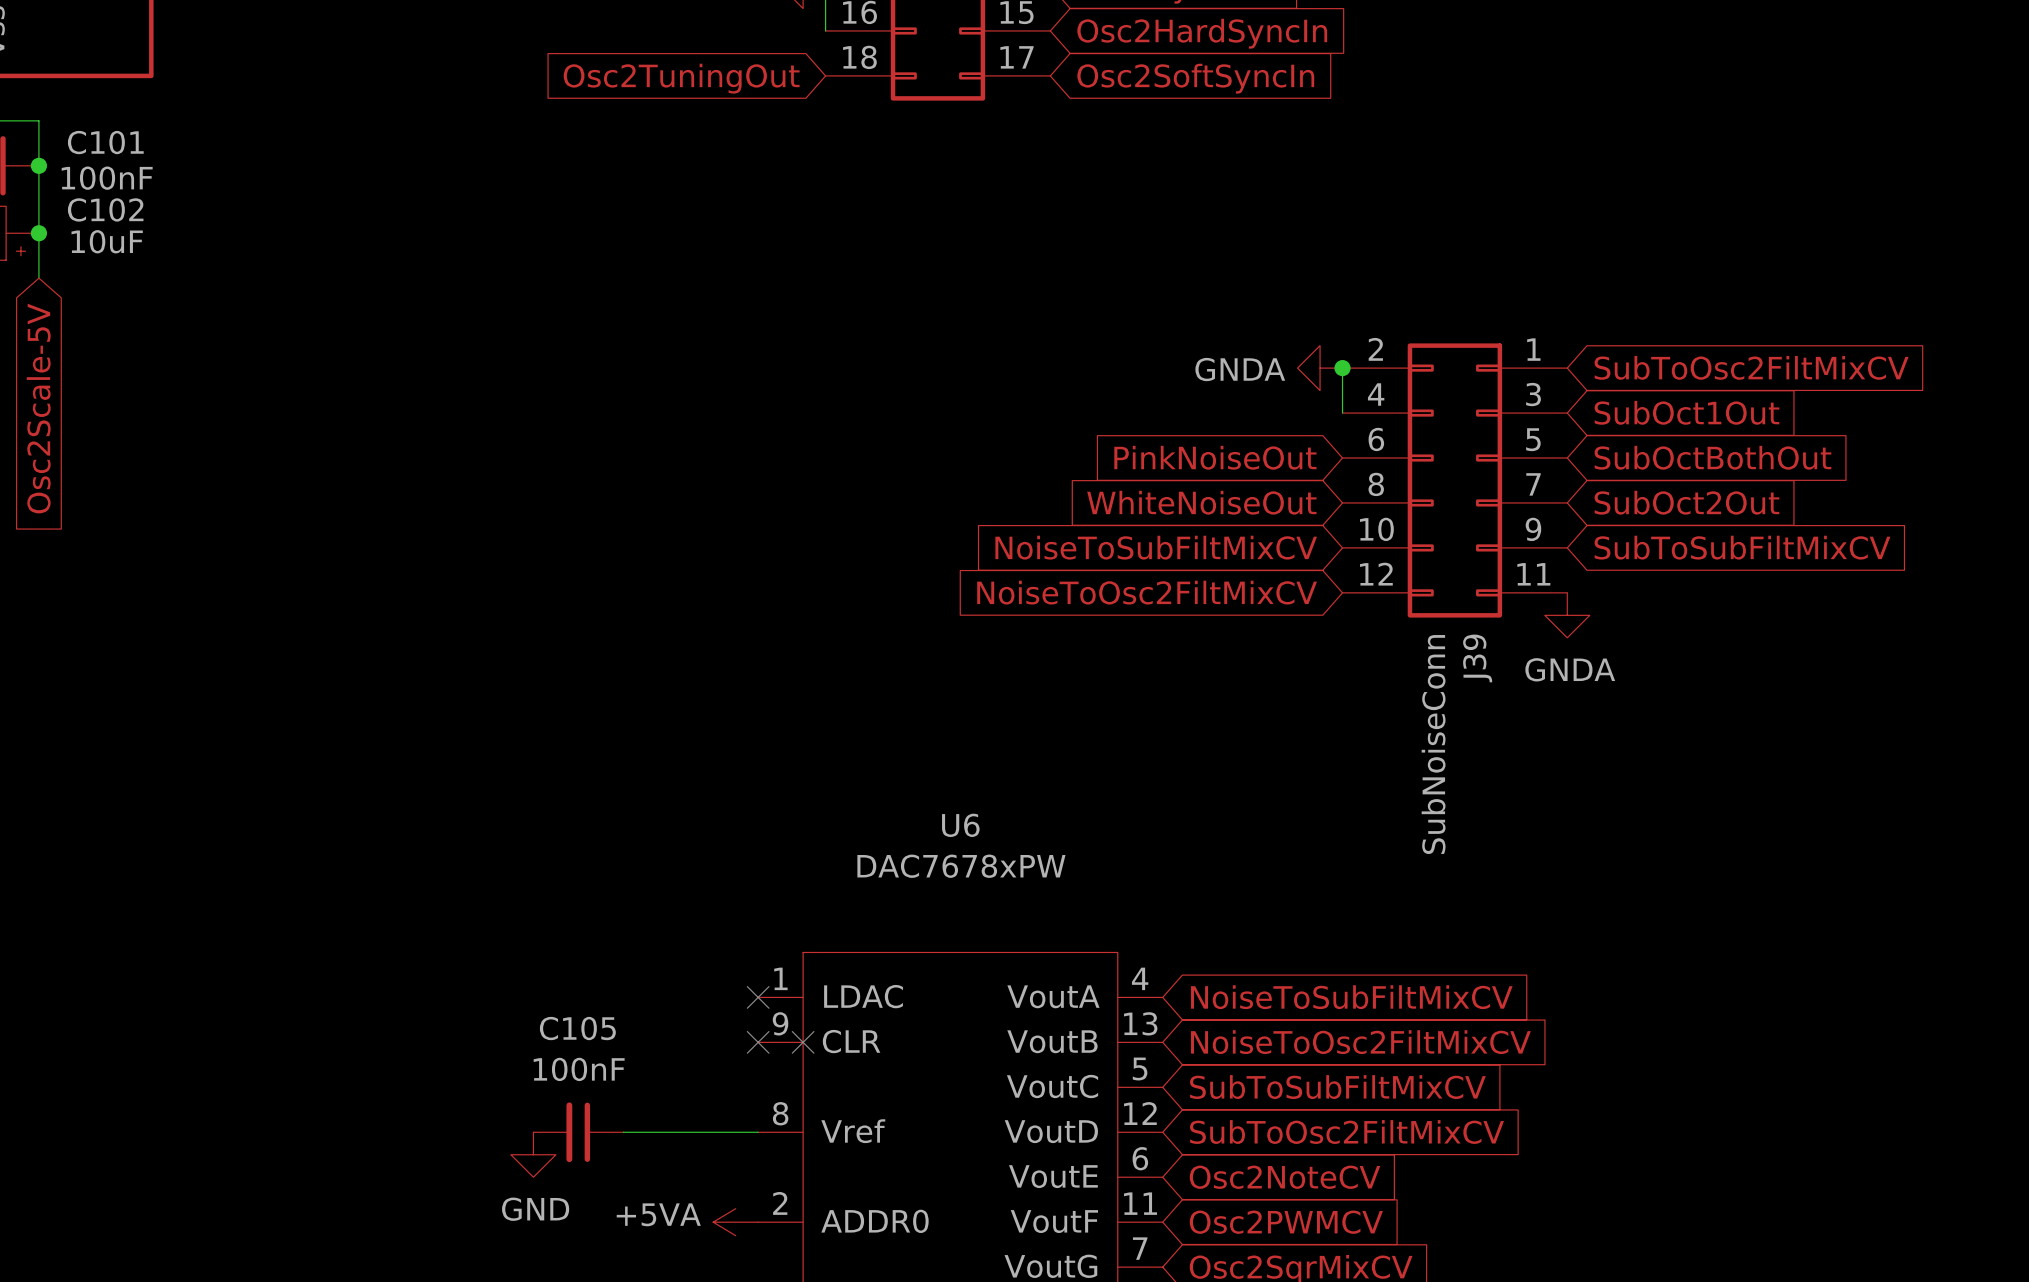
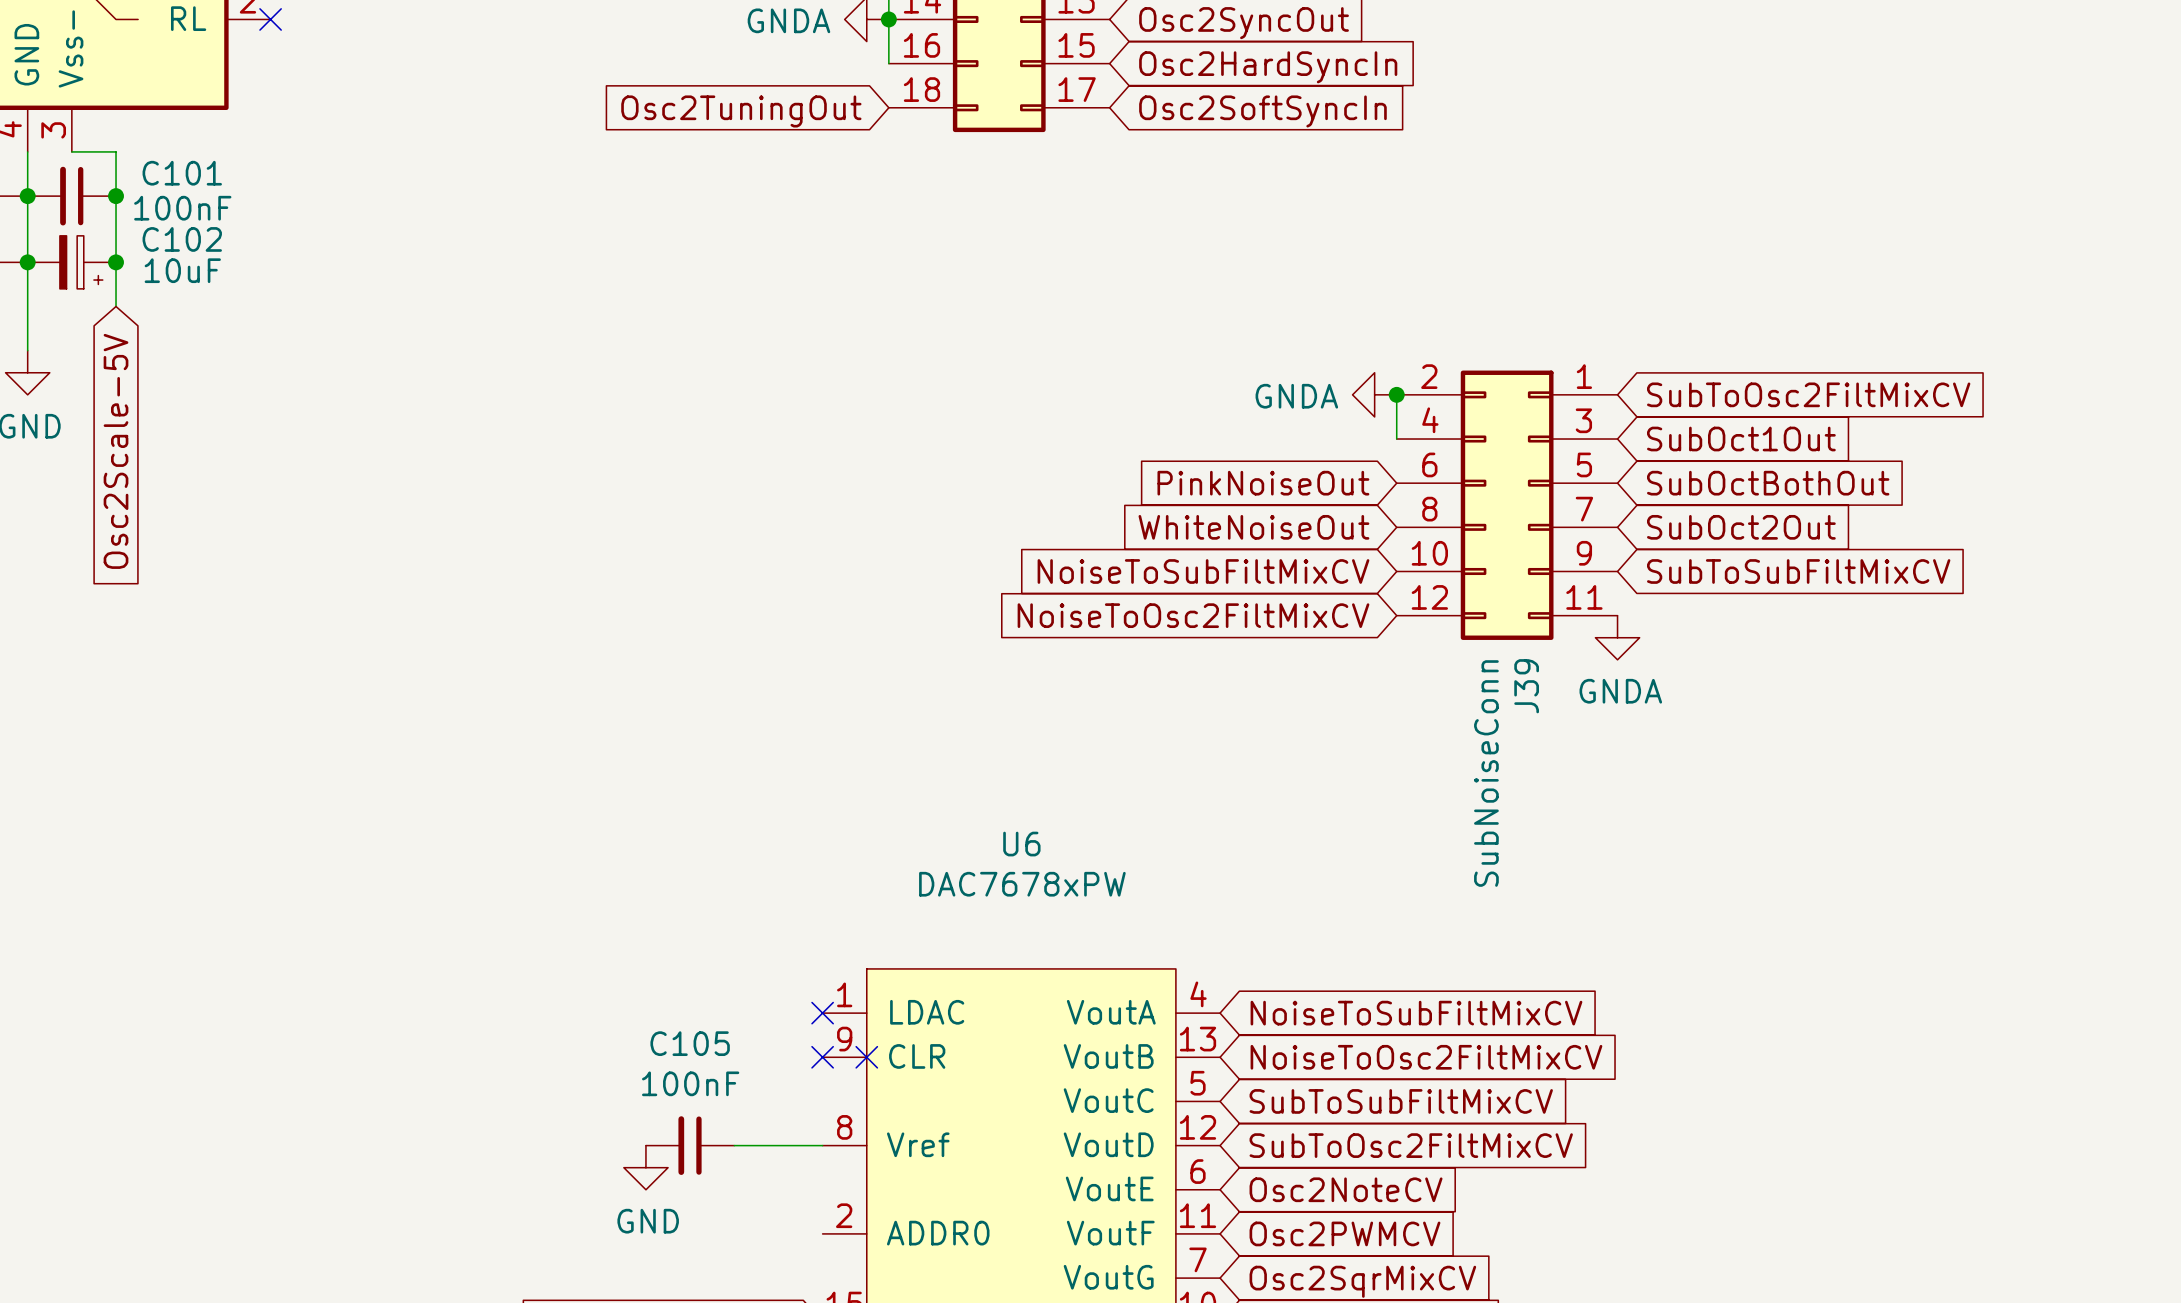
C105 position: (578, 1132) -> (690, 1145)
power symbol position: GND (533, 1154) -> GND (645, 1167)
power symbol: +5VA (735, 1222) -> none

